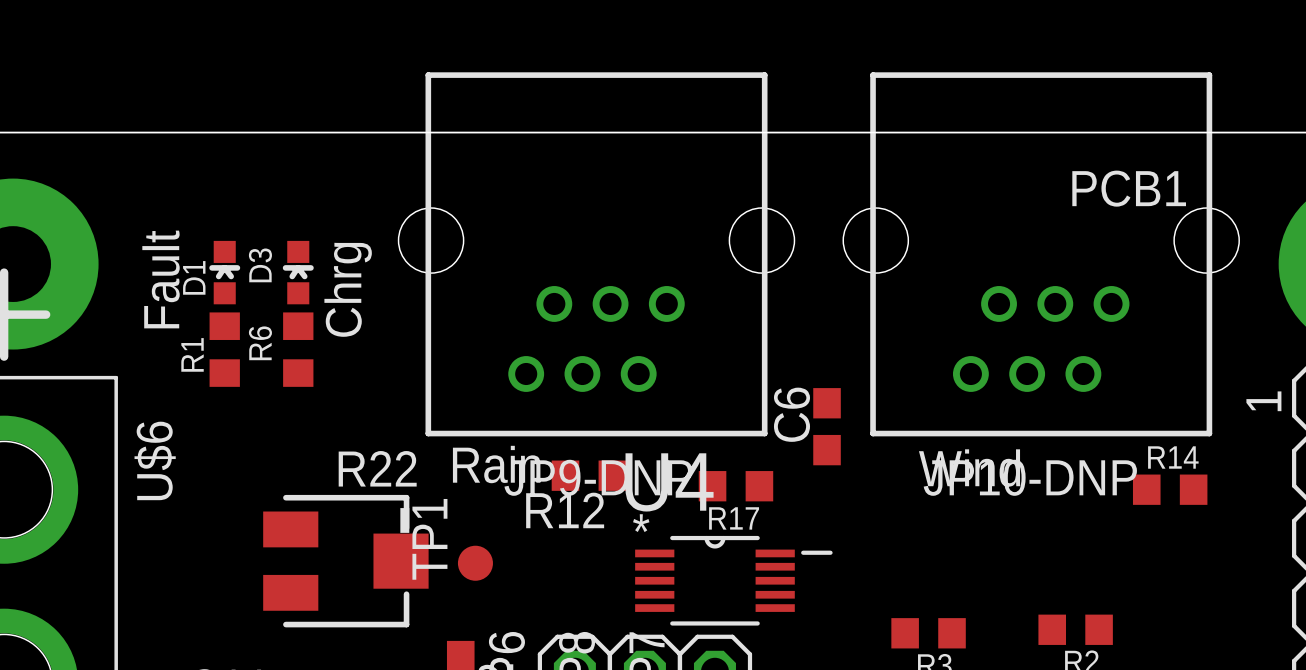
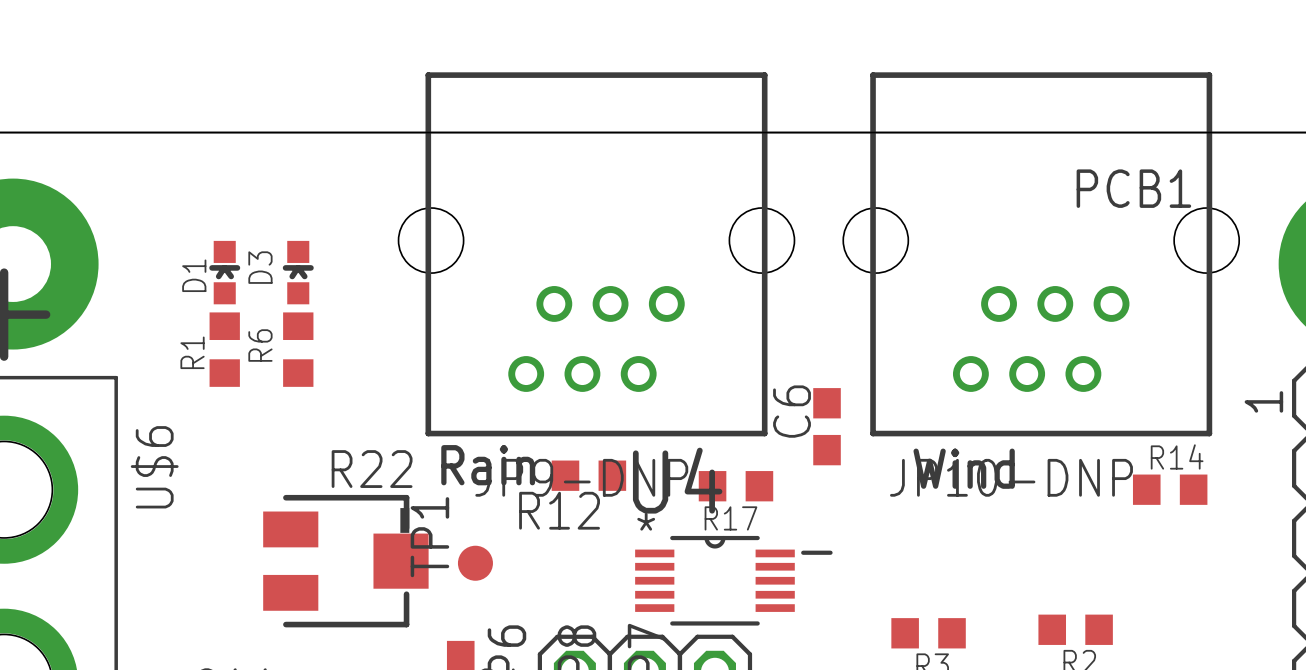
text: Fault (161, 279) -> none
text: Chrg (348, 289) -> none

